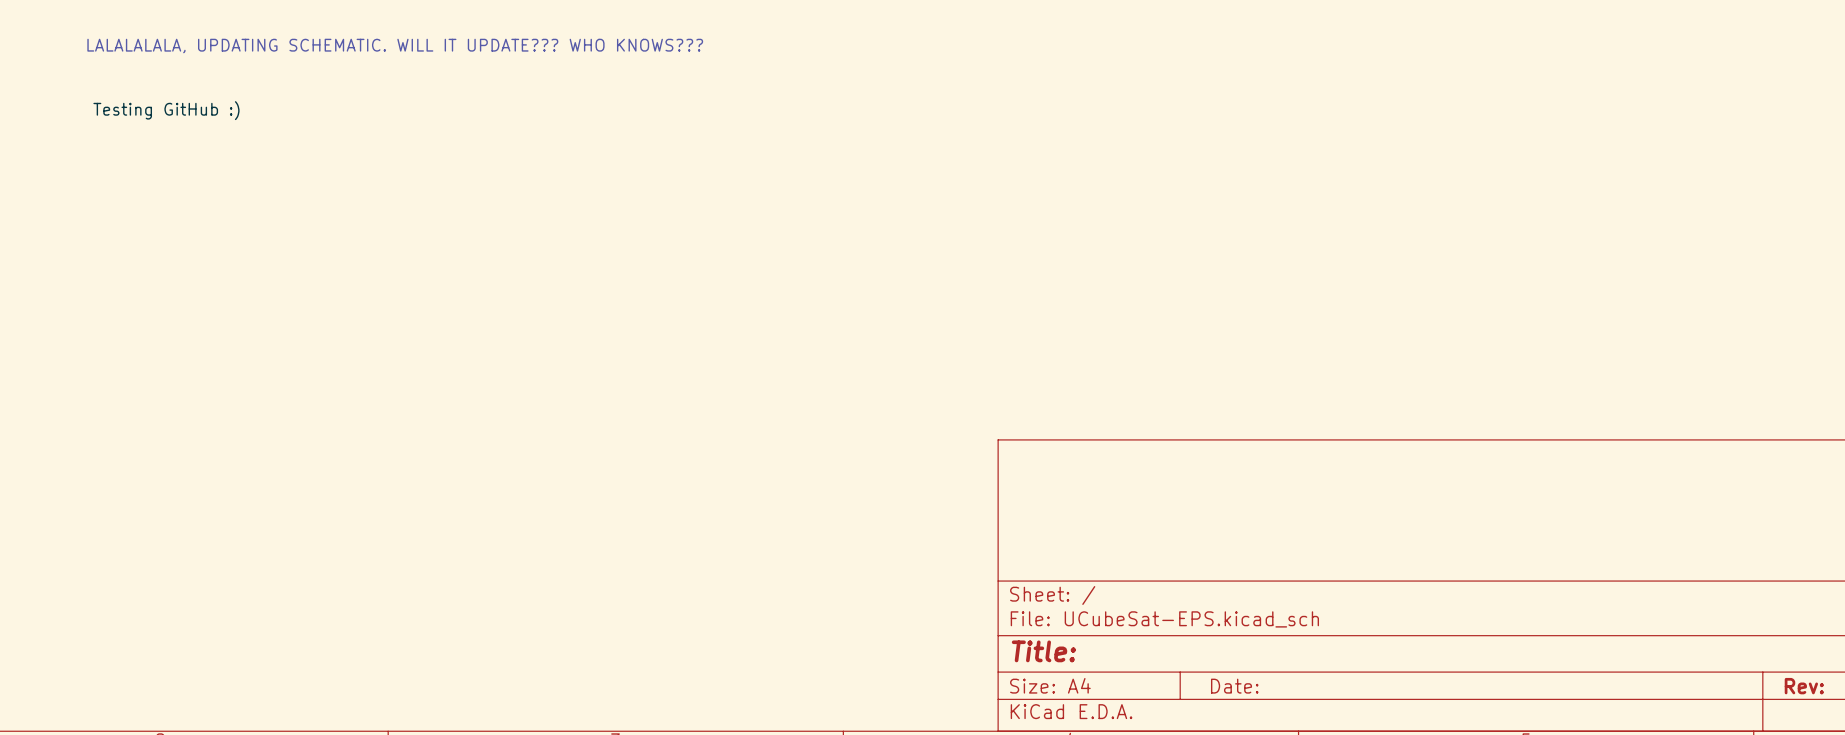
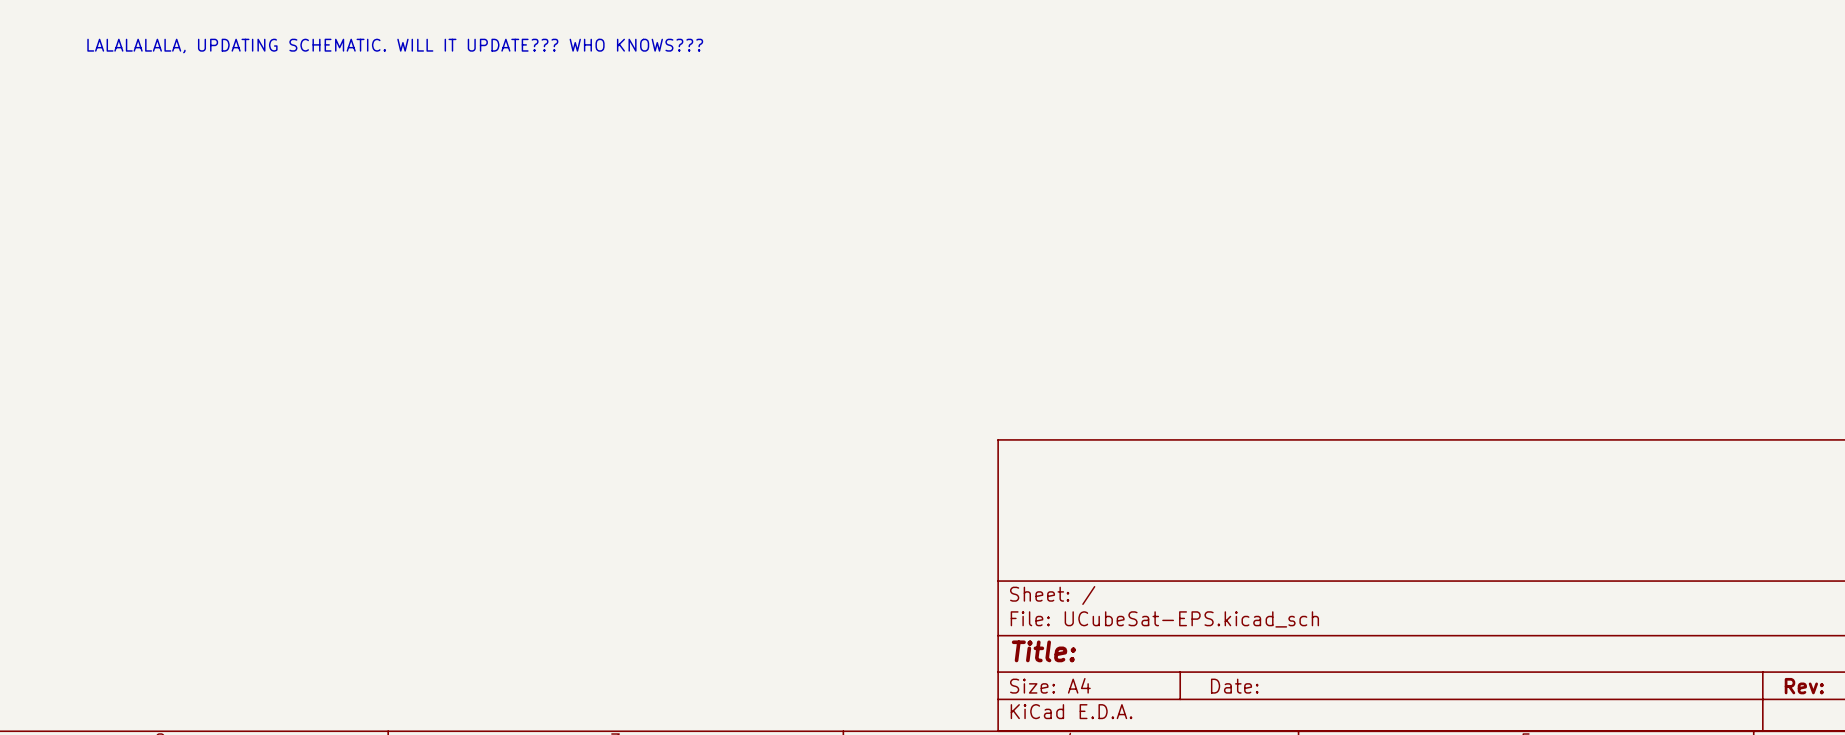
label: Testing GitHub :) (166, 110) -> none

